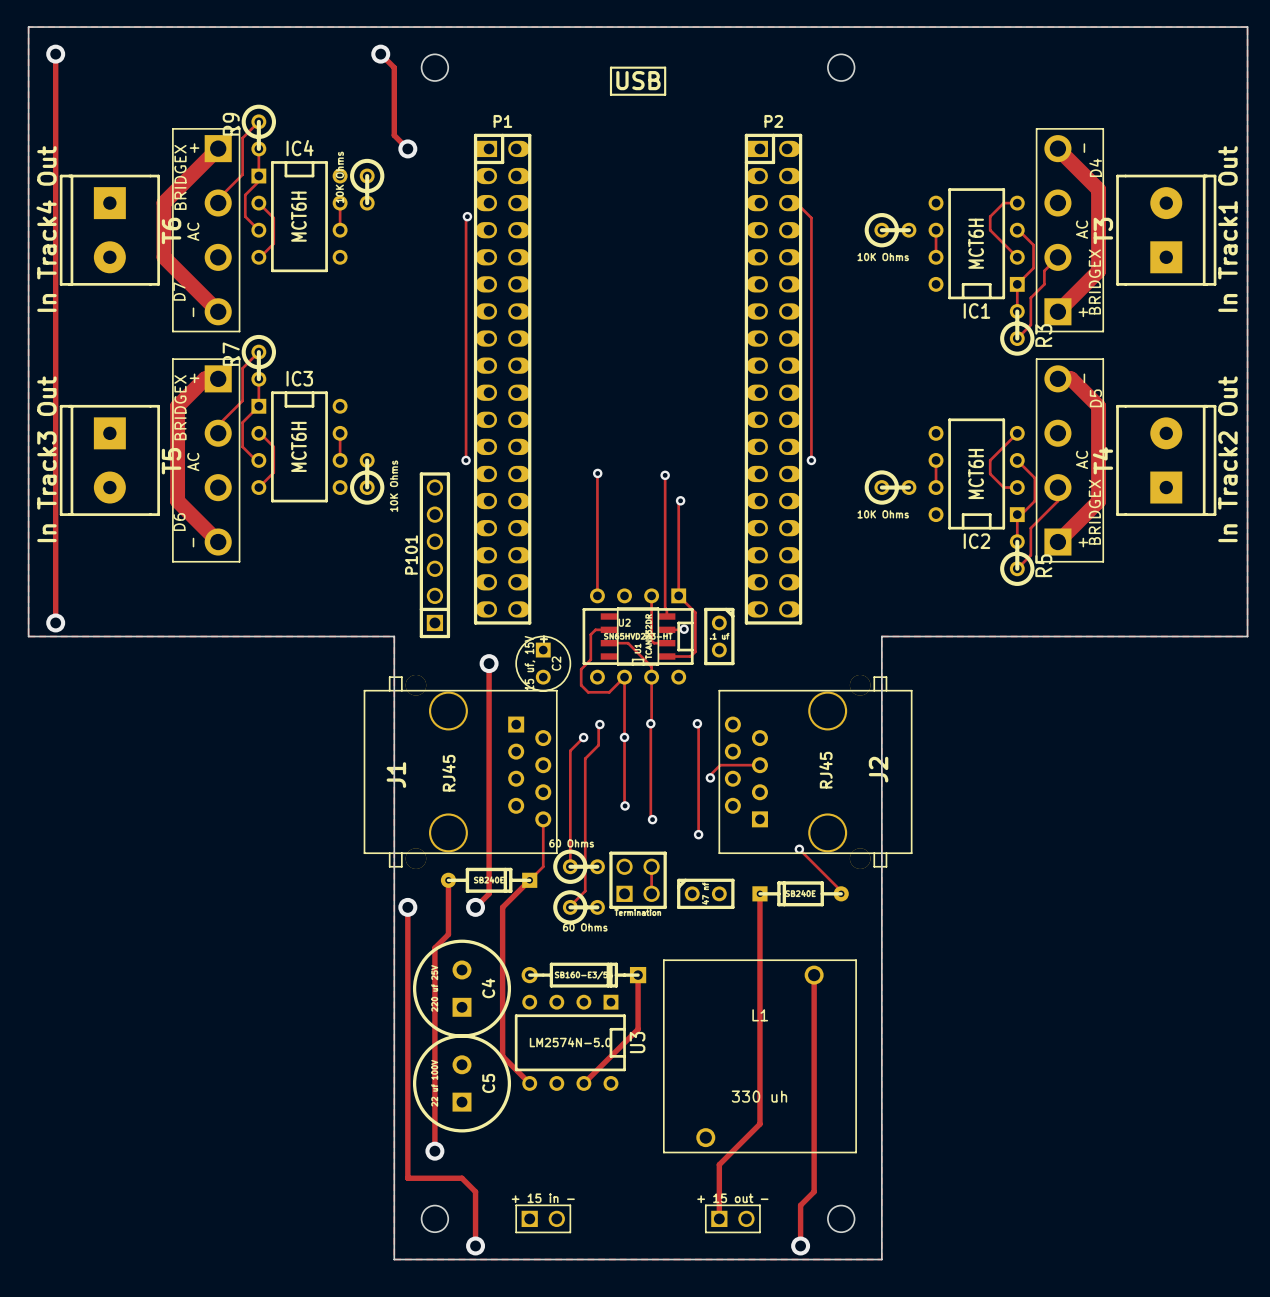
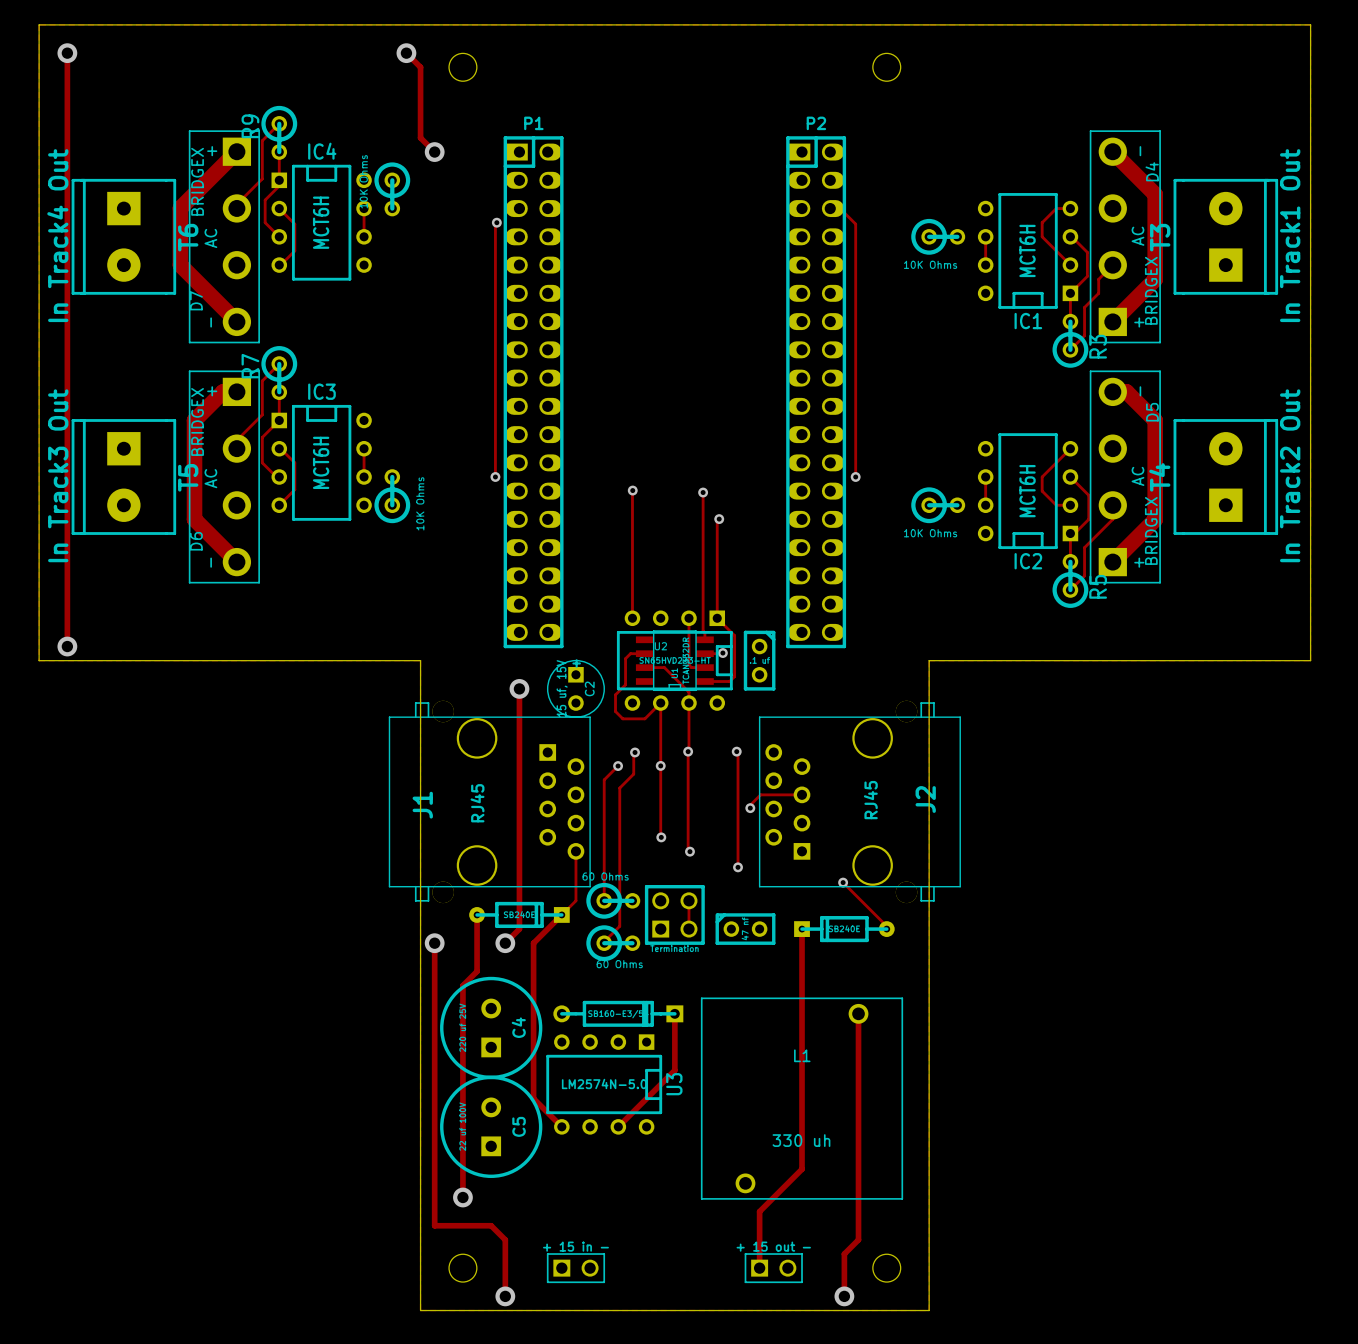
line: (610, 67) (610, 94) (665, 94) (665, 67) (610, 67) -> none
text: USB (638, 80) -> none
P101: (434, 555) -> none

